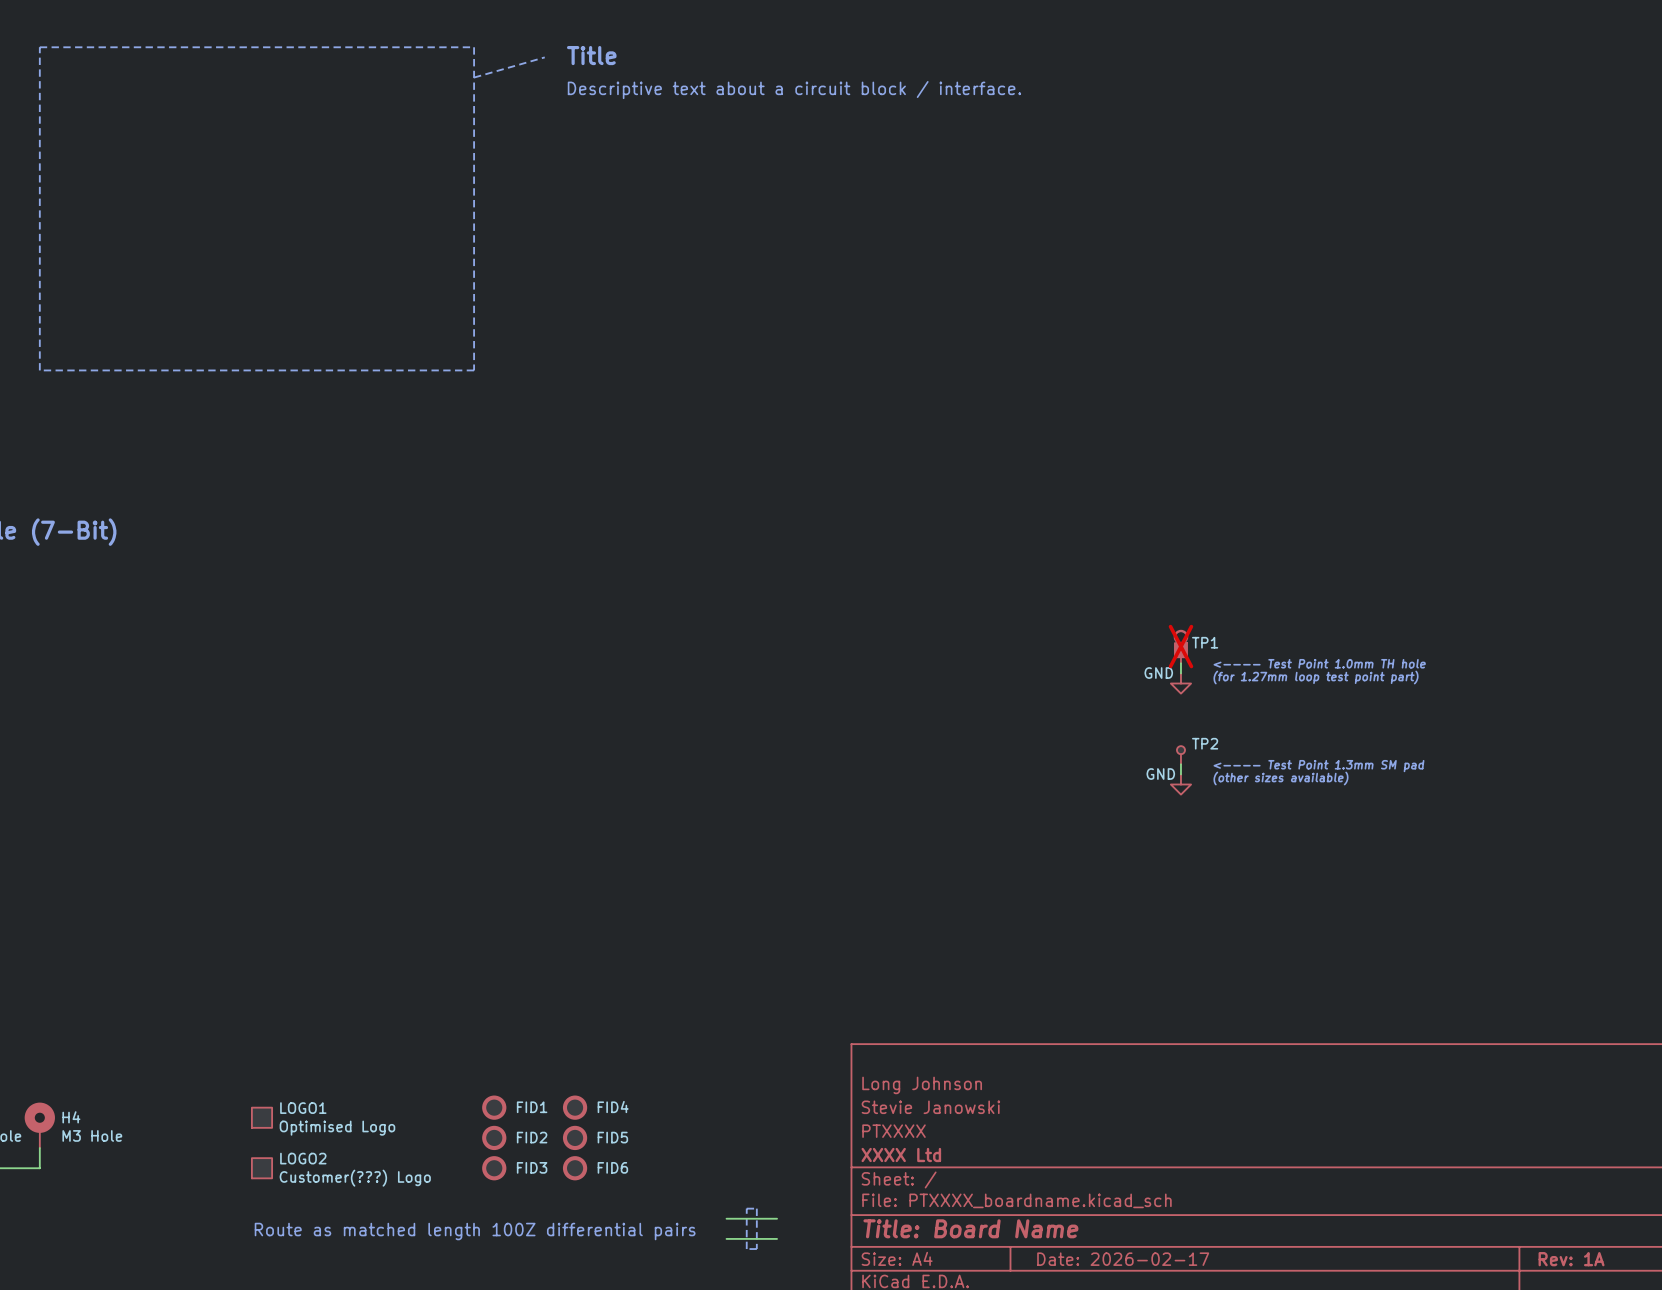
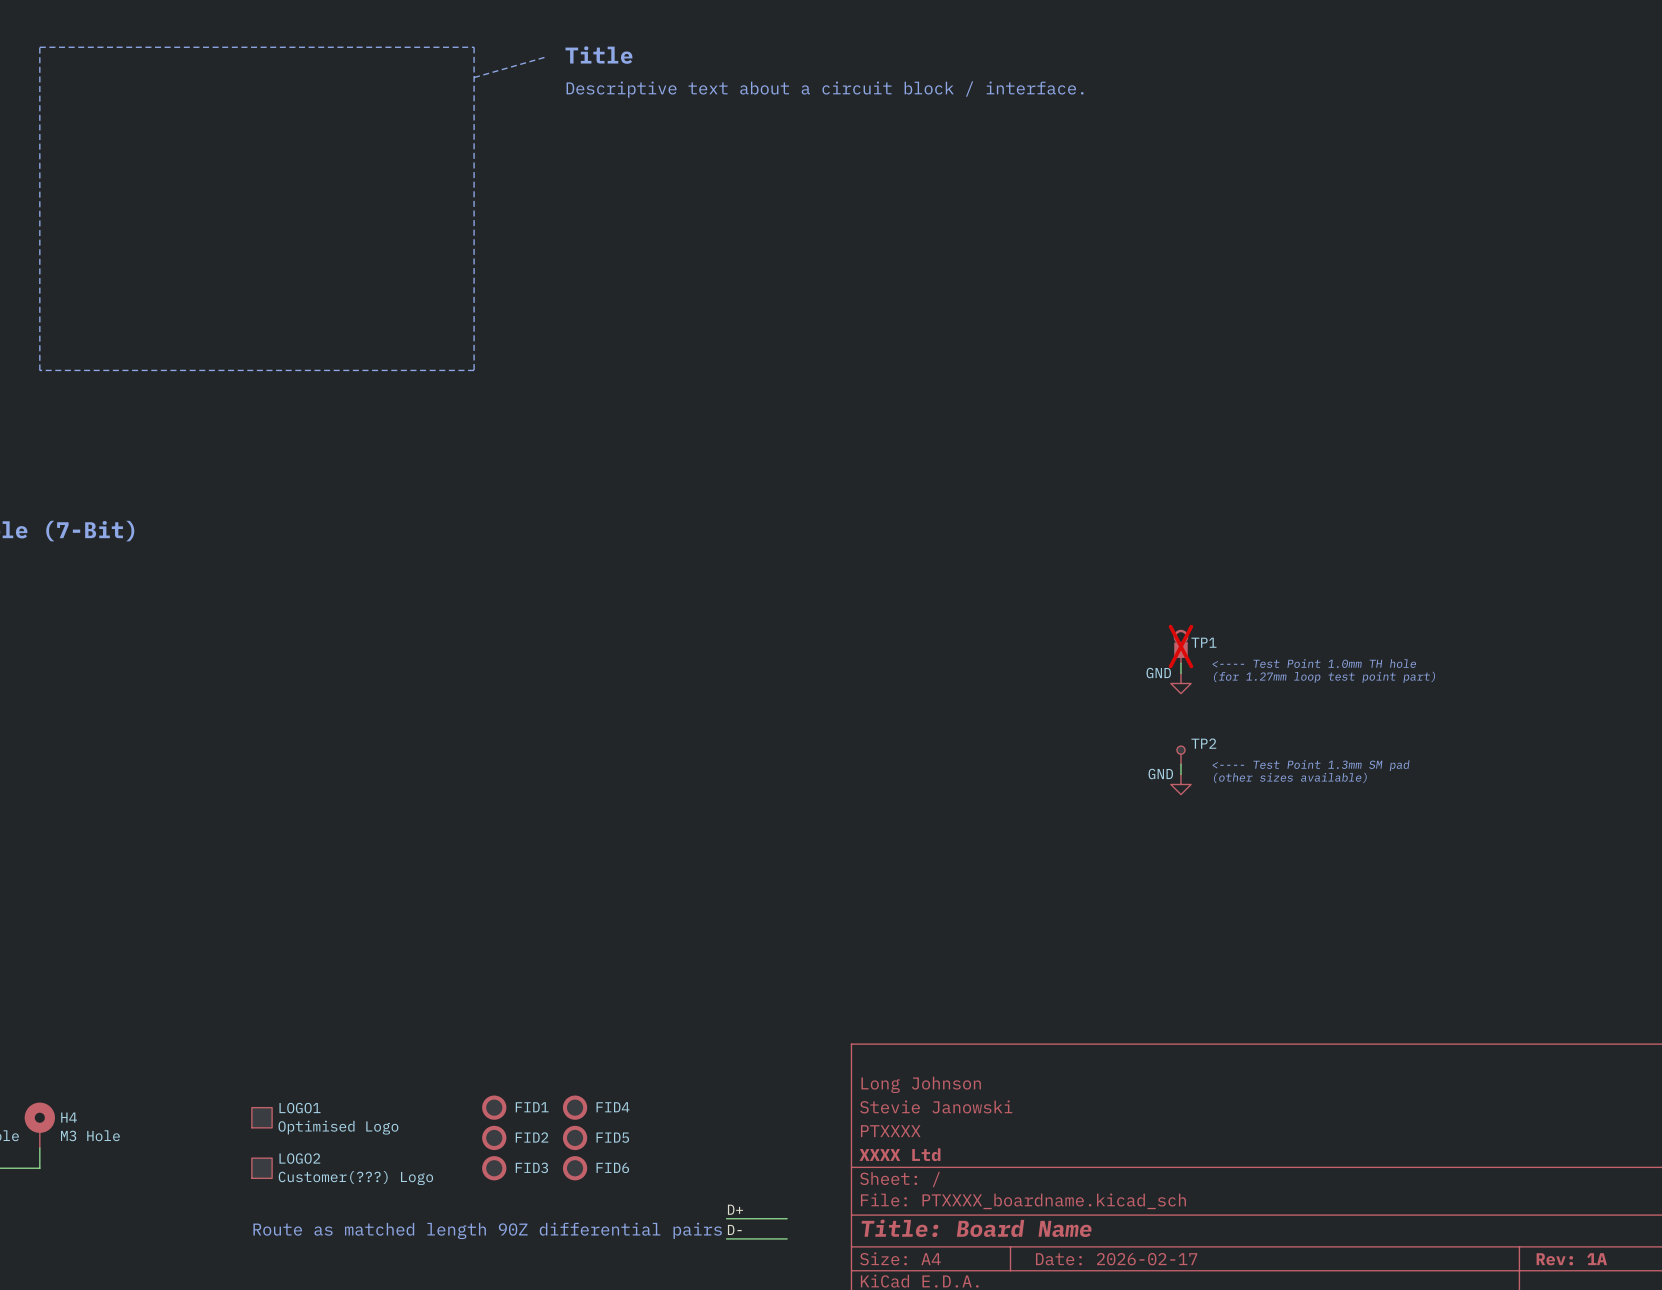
line: (746, 1208) (756, 1208) (756, 1249) (746, 1249) (746, 1208) -> none
label: none -> D+ (735, 1209)
wire: none -> (777, 1218) (787, 1218)
label: none -> D- (734, 1229)
text: Route as matched length 100Z differential pairs (475, 1231) -> Route as matched length 90Z differential pairs (487, 1230)
wire: none -> (777, 1238) (787, 1238)

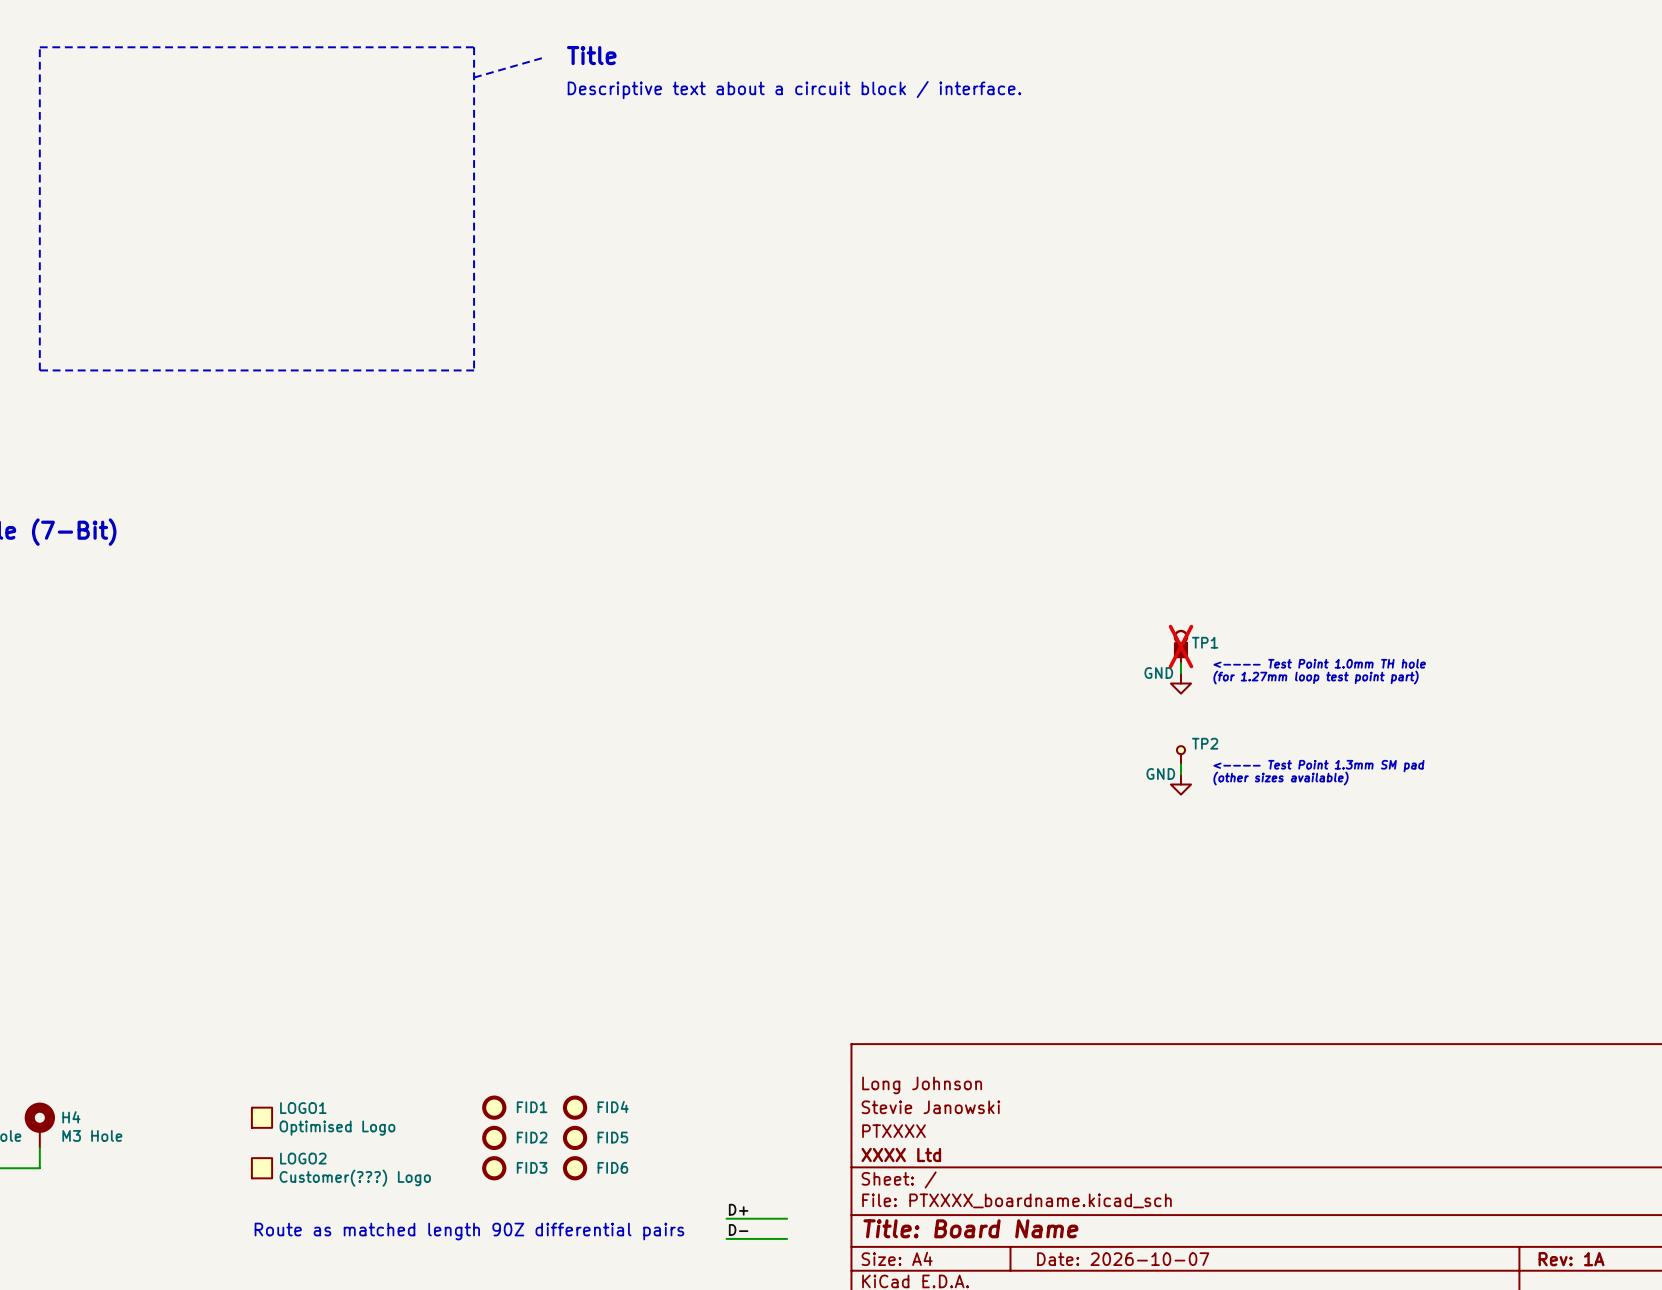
title block: Date: 2026-02-17 (1116, 1259) -> Date: 2026-10-07 (1123, 1259)

